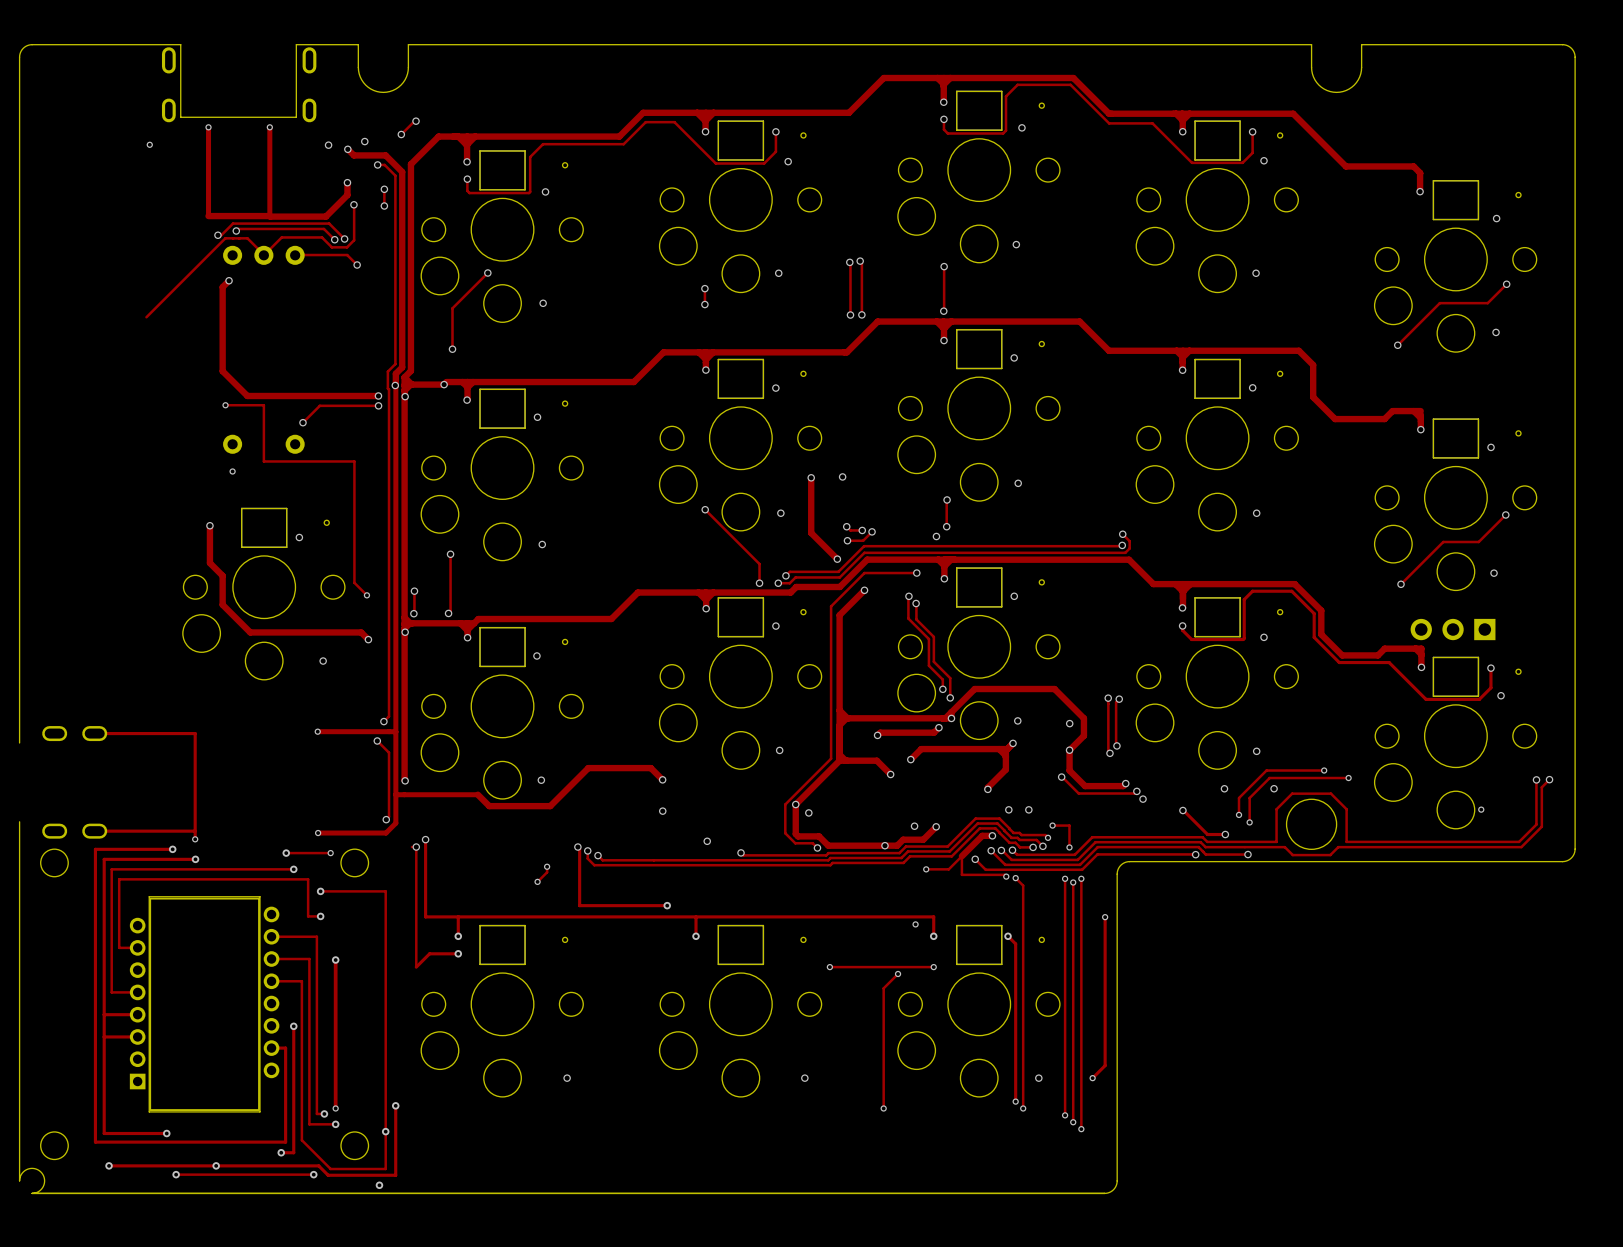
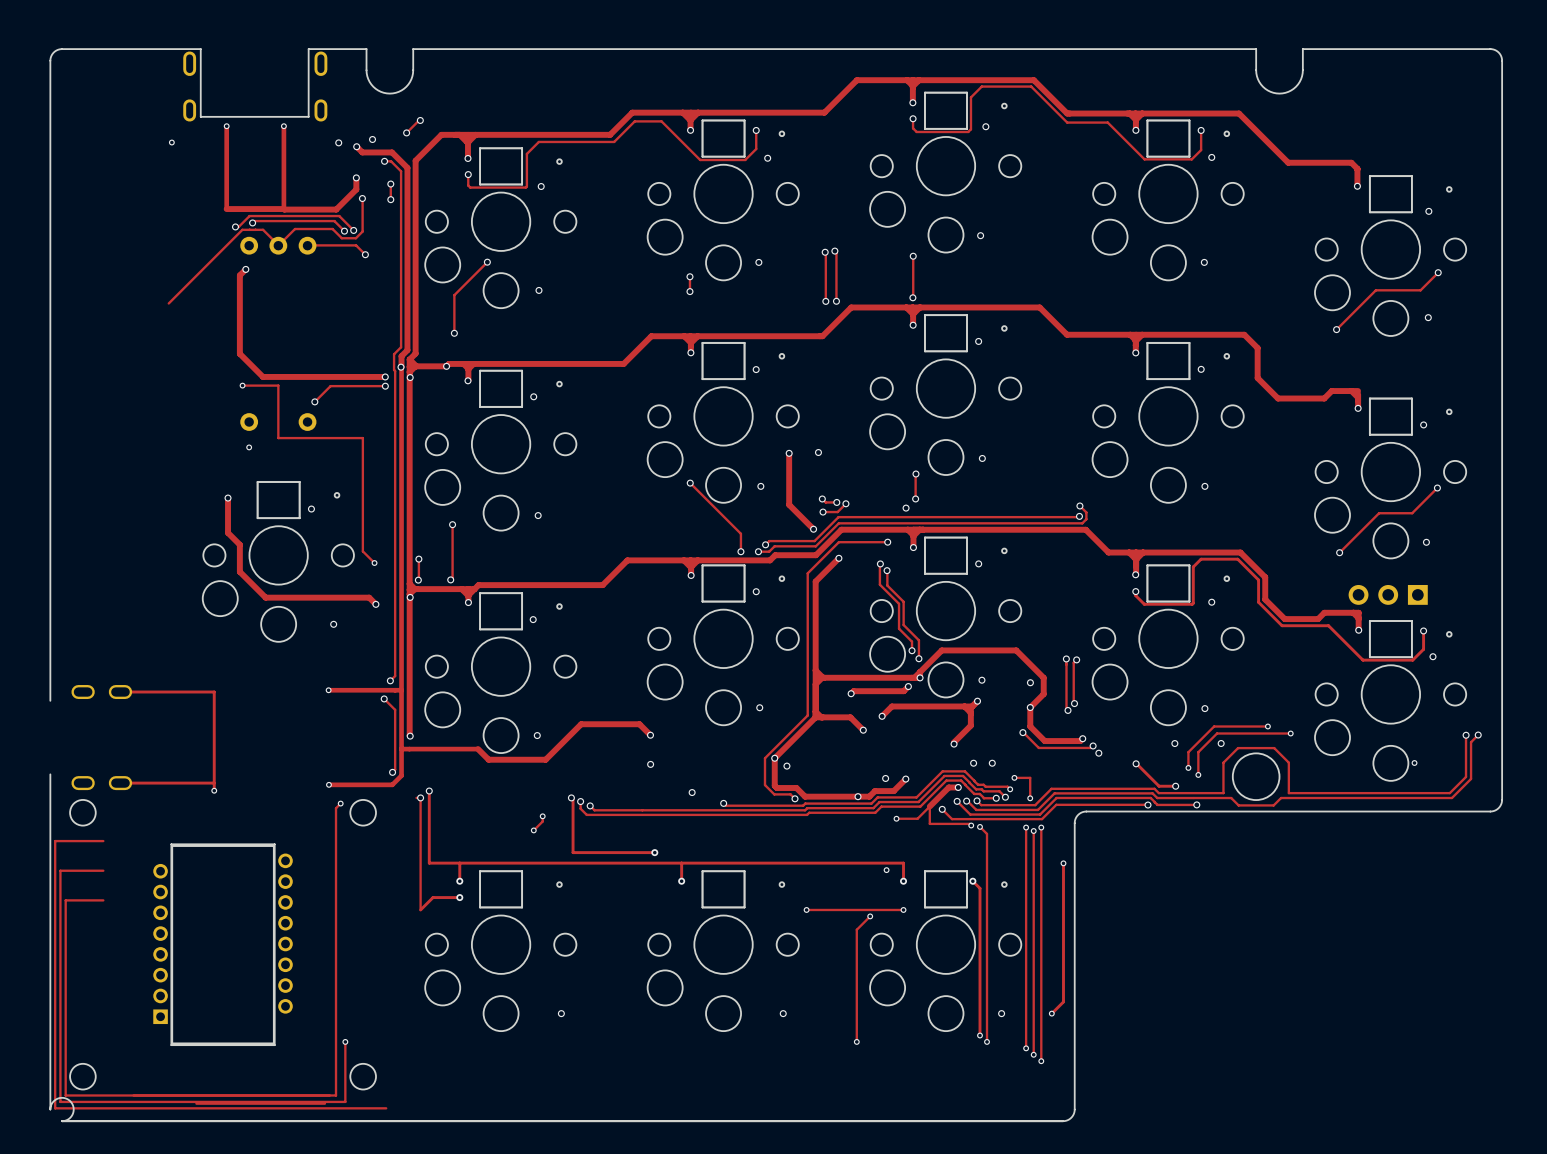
track: (172, 849) (95, 849) (95, 1142) (285, 1142) (285, 1048) (271, 1048) -> none
via: (172, 849) -> none
track: (286, 853) (330, 853) -> none
via: (286, 853) -> none
track: (195, 859) (104, 859) (104, 1133) (166, 1133) -> none
via: (195, 859) -> none
track: (293, 869) (111, 869) (111, 992) (137, 992) -> none
via: (293, 869) -> none
track: (320, 891) (385, 891) (385, 1169) (330, 1169) (301, 1140) (301, 981) (271, 981) -> none
via: (320, 891) -> none
track: none -> (103, 841) (55, 841) (55, 1108) (386, 1108)
track: (320, 916) (308, 916) (308, 879) (119, 879) (119, 947) (137, 947) -> none
via: (320, 916) -> none
track: (271, 936) (316, 936) (316, 1113) (324, 1113) -> none
track: none -> (103, 900) (65, 900) (65, 1095) (133, 1095)
track: (271, 959) (309, 959) (309, 1124) (335, 1124) -> none
track: (335, 960) (335, 1108) -> (103, 870) (60, 870) (60, 1101) (345, 1101) (345, 1041)
via: (335, 960) -> none
track: (104, 1014) (137, 1014) -> none
track: (293, 1026) (293, 1152) (281, 1152) -> none
via: (293, 1026) -> none
track: (104, 1036) (137, 1036) -> none
track: (395, 1105) (395, 1175) (328, 1175) (318, 1165) -> (340, 803) (336, 808) (336, 1095) (329, 1095)
via: (395, 1105) -> none
via: (324, 1113) -> none
via: (335, 1124) -> none
via: (385, 1131) -> none
via: (166, 1133) -> none
via: (281, 1152) -> none
via: (109, 1165) -> none
via: (216, 1165) -> none
via: (176, 1174) -> none
via: (313, 1174) -> none
via: (379, 1185) -> none

